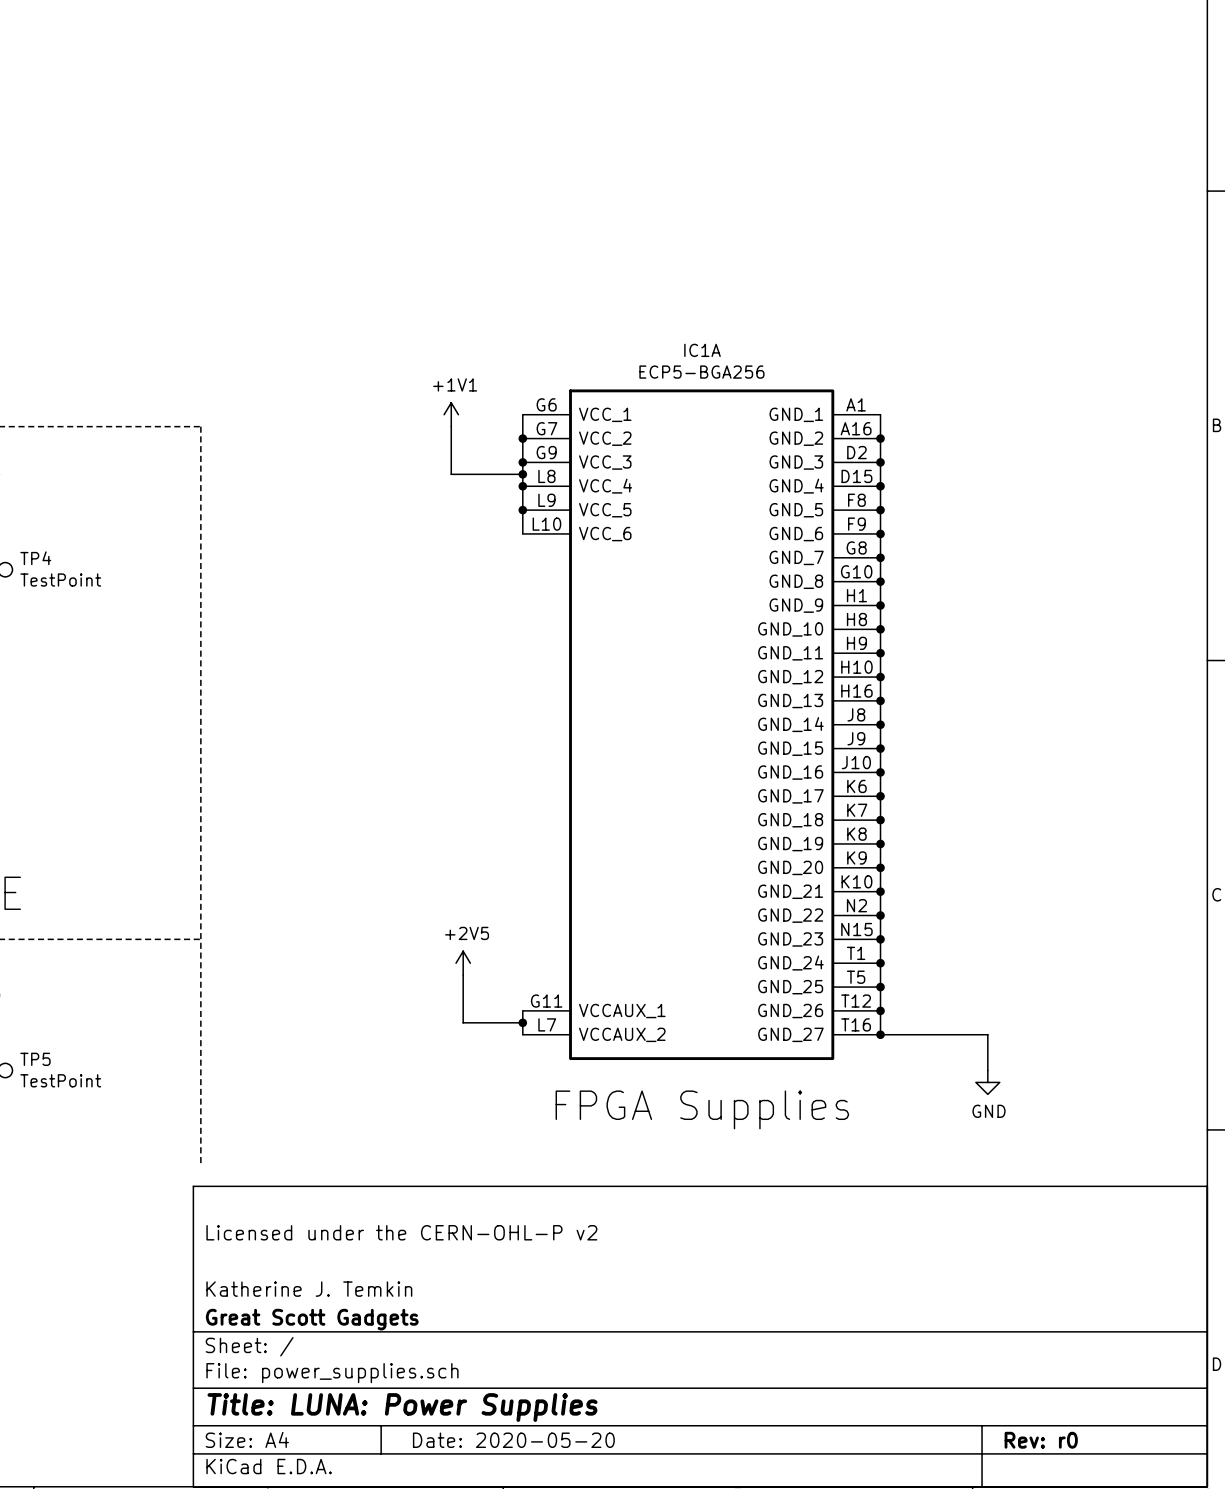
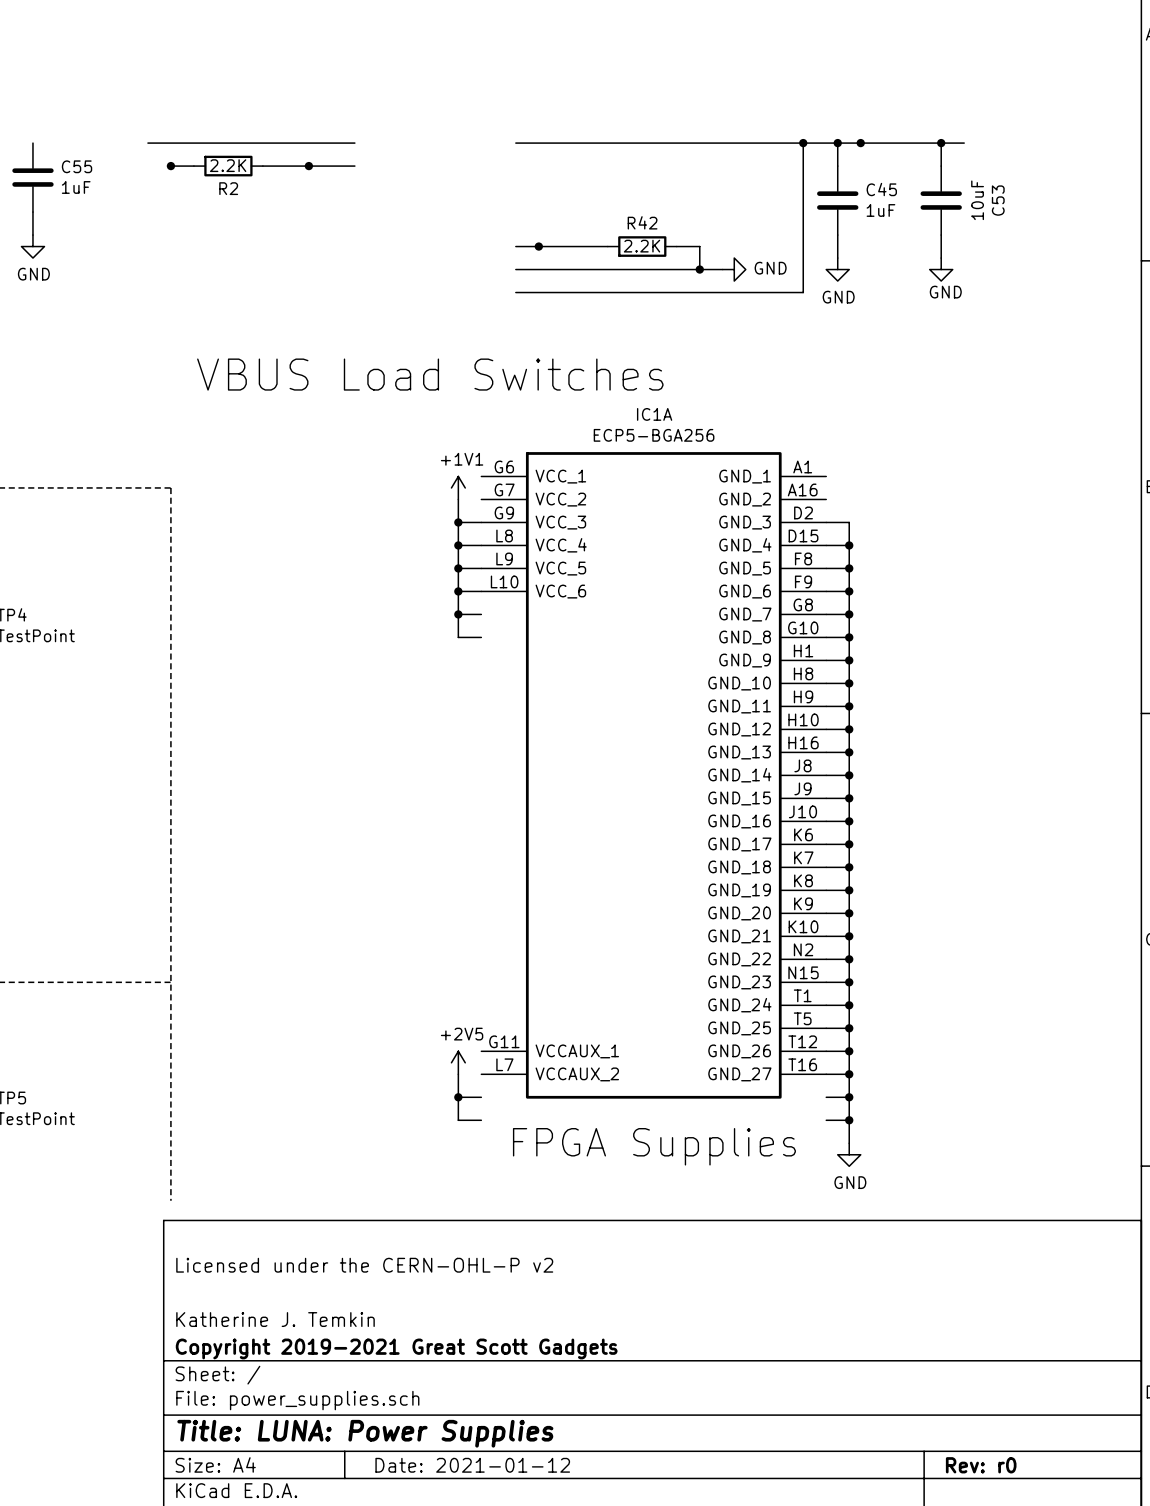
wire: none -> (147, 143) (354, 143)
wire: none -> (515, 143) (964, 143)
wire: none -> (803, 143) (803, 292) (515, 292)
junction: none -> (803, 143)
wire: none -> (837, 143) (837, 166)
junction: none -> (837, 143)
junction: none -> (860, 143)
wire: none -> (941, 143) (941, 166)
junction: none -> (941, 143)
wire: none -> (170, 166) (193, 166)
junction: none -> (170, 166)
R2: none -> 2.2K (228, 166)
wire: none -> (262, 166) (354, 166)
junction: none -> (308, 166)
C55: none -> 1uF (32, 177)
C45: none -> 1uF (837, 200)
C53: none -> 10uF (941, 200)
wire: none -> (32, 212) (32, 235)
wire: none -> (837, 235) (837, 258)
wire: none -> (941, 235) (941, 258)
power symbol: none -> GND (32, 246)
wire: none -> (515, 246) (607, 246)
junction: none -> (538, 246)
R42: none -> 2.2K (642, 246)
wire: none -> (676, 246) (699, 246) (699, 269)
wire: none -> (515, 269) (722, 269)
junction: none -> (699, 269)
power symbol: none -> GND (734, 269)
power symbol: none -> GND (837, 269)
power symbol: none -> GND (941, 269)
text: none -> VBUS Load Switches (430, 374)
power symbol position: +1V1 (451, 414) -> +1V1 (458, 487)
wire: (522, 414) (522, 533) -> (458, 591) (481, 591)
wire: (880, 414) (880, 1034) -> none
wire: (451, 426) (451, 474) (522, 474) -> none
wire: none -> (458, 499) (458, 637) (481, 637)
junction: (522, 438) -> none
junction: (880, 438) -> none
wire: none -> (458, 522) (481, 522)
junction: none -> (458, 522)
junction: (522, 462) -> none
wire: none -> (826, 522) (849, 522) (849, 1143)
junction: (880, 462) -> none
junction: (522, 474) -> none
wire: none -> (458, 545) (481, 545)
junction: none -> (458, 545)
junction: (522, 486) -> none
wire: none -> (826, 545) (849, 545)
junction: (880, 486) -> none
junction: none -> (849, 545)
wire: none -> (458, 568) (481, 568)
junction: none -> (458, 568)
junction: (522, 510) -> none
wire: none -> (826, 568) (849, 568)
junction: (880, 510) -> none
junction: none -> (849, 568)
junction: none -> (458, 591)
wire: none -> (826, 591) (849, 591)
junction: (880, 533) -> none
junction: none -> (849, 591)
wire: none -> (458, 614) (481, 614)
junction: none -> (458, 614)
wire: none -> (826, 614) (849, 614)
junction: (880, 557) -> none
junction: none -> (849, 614)
wire: none -> (826, 637) (849, 637)
junction: (880, 581) -> none
junction: none -> (849, 637)
wire: none -> (826, 660) (849, 660)
junction: (880, 605) -> none
junction: none -> (849, 660)
wire: none -> (826, 683) (849, 683)
junction: (880, 629) -> none
junction: none -> (849, 683)
wire: none -> (826, 706) (849, 706)
junction: (880, 653) -> none
junction: none -> (849, 706)
wire: none -> (826, 729) (849, 729)
junction: (880, 677) -> none
junction: none -> (849, 729)
wire: none -> (826, 752) (849, 752)
junction: (880, 700) -> none
junction: none -> (849, 752)
wire: none -> (826, 775) (849, 775)
junction: (880, 724) -> none
junction: none -> (849, 775)
wire: none -> (826, 798) (849, 798)
junction: (880, 748) -> none
junction: none -> (849, 798)
wire: none -> (826, 821) (849, 821)
junction: (880, 772) -> none
junction: none -> (849, 821)
wire: none -> (826, 844) (849, 844)
junction: (880, 796) -> none
junction: none -> (849, 844)
wire: none -> (826, 867) (849, 867)
junction: (880, 820) -> none
junction: none -> (849, 867)
wire: none -> (826, 890) (849, 890)
junction: (880, 843) -> none
junction: none -> (849, 890)
wire: none -> (826, 913) (849, 913)
junction: (880, 867) -> none
junction: none -> (849, 913)
wire: none -> (826, 936) (849, 936)
junction: (880, 891) -> none
junction: none -> (849, 936)
wire: none -> (826, 959) (849, 959)
junction: (880, 915) -> none
junction: none -> (849, 959)
wire: none -> (826, 982) (849, 982)
junction: (880, 939) -> none
junction: none -> (849, 982)
power symbol position: +2V5 (463, 963) -> +2V5 (458, 1062)
wire: none -> (826, 1005) (849, 1005)
junction: (880, 963) -> none
junction: none -> (849, 1005)
wire: (463, 975) (463, 1022) (522, 1022) -> none
wire: none -> (826, 1028) (849, 1028)
junction: (880, 987) -> none
junction: none -> (849, 1028)
wire: (522, 1010) (522, 1034) -> none
wire: none -> (826, 1051) (849, 1051)
junction: (880, 1010) -> none
junction: none -> (849, 1051)
junction position: (522, 1022) -> (458, 1097)
wire: none -> (458, 1074) (458, 1120) (481, 1120)
junction: (880, 1034) -> none
wire: (904, 1034) (987, 1034) (987, 1070) -> none
junction: none -> (849, 1074)
wire: none -> (458, 1097) (481, 1097)
wire: none -> (826, 1097) (849, 1097)
junction: none -> (849, 1097)
wire: none -> (826, 1120) (849, 1120)
junction: none -> (849, 1120)
power symbol position: GND (987, 1082) -> GND (849, 1154)
title block: Great Scott Gadgets (312, 1319) -> Copyright 2019-2021 Great Scott Gadgets (396, 1348)
title block: Date: 2020-05-20 (513, 1440) -> Date: 2021-01-12 (472, 1465)

